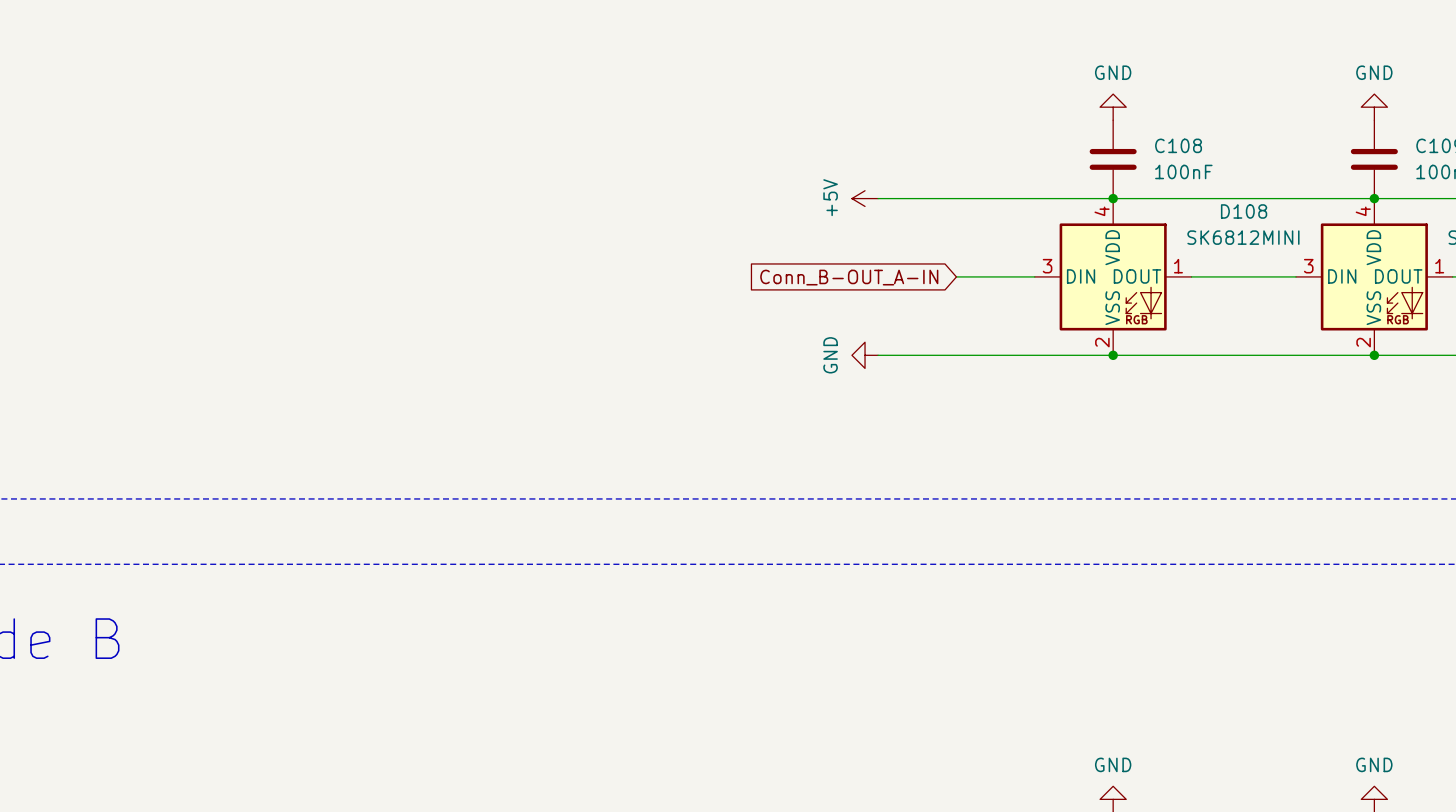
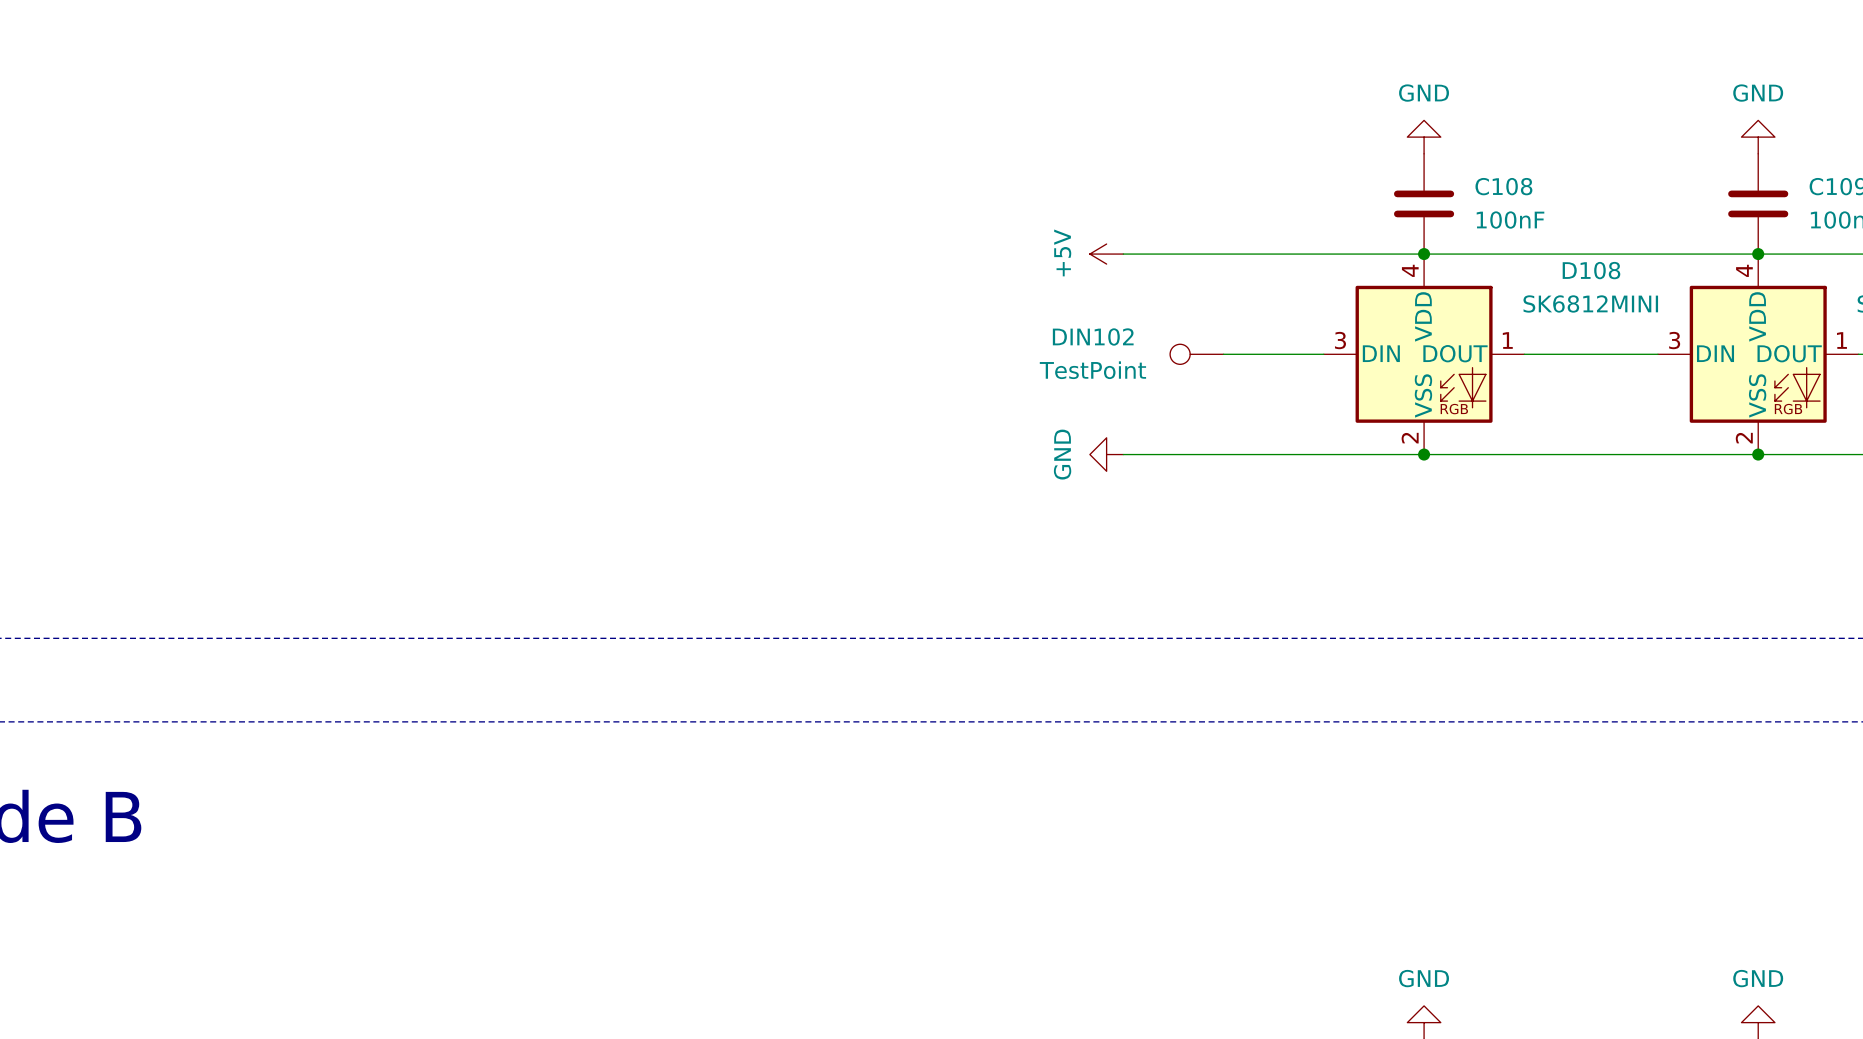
DIN102: none -> TestPoint (1196, 354)
global label: Conn_B-OUT_A-IN (849, 277) -> none

